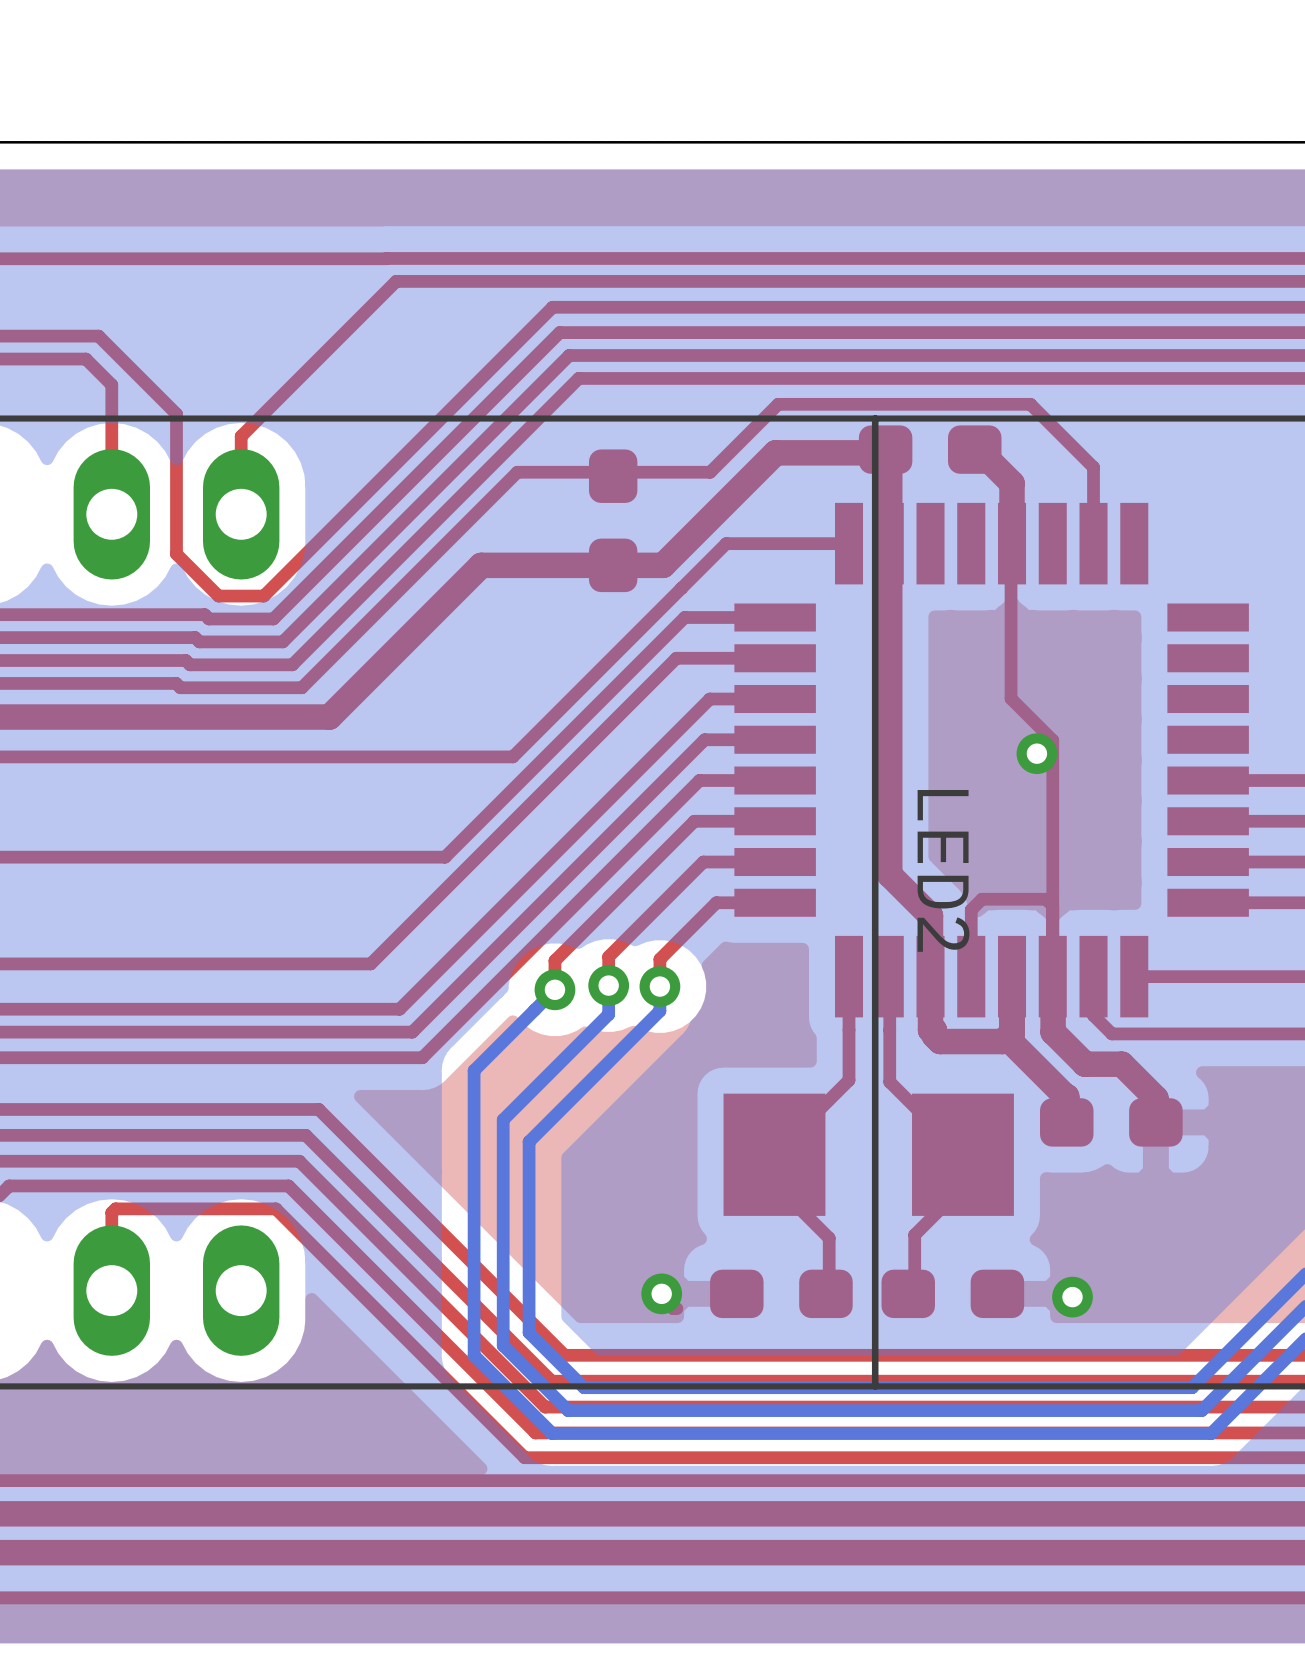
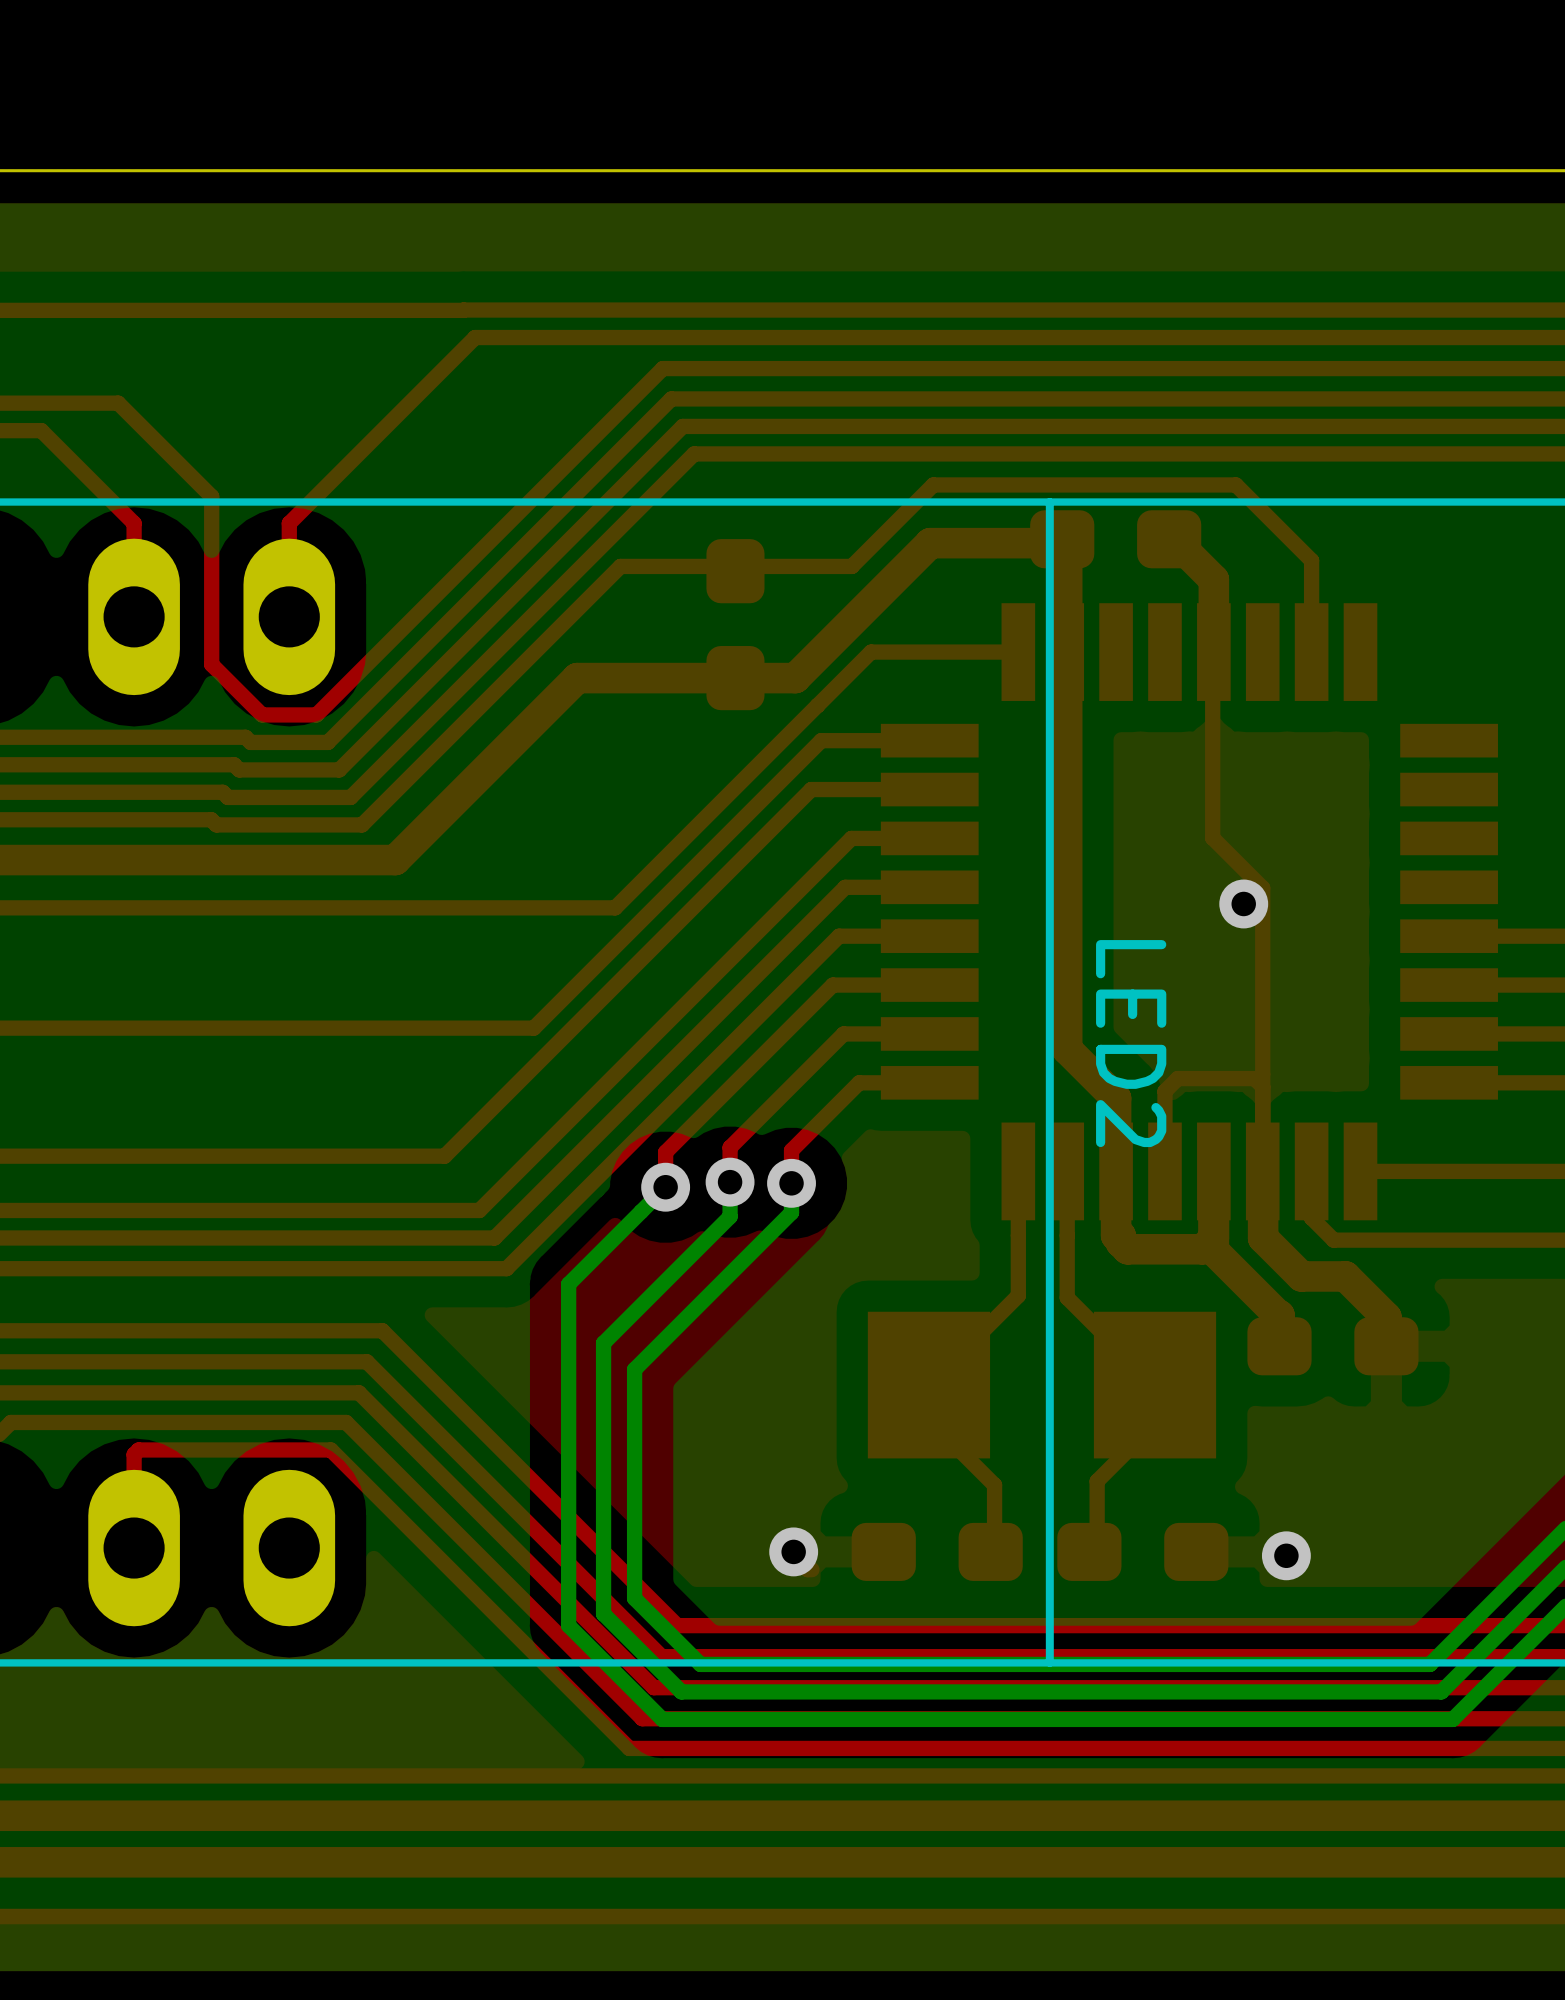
top track: (34, 359) (85, 359) (111, 384) (111, 436) -> (41, 430) (134, 523)

